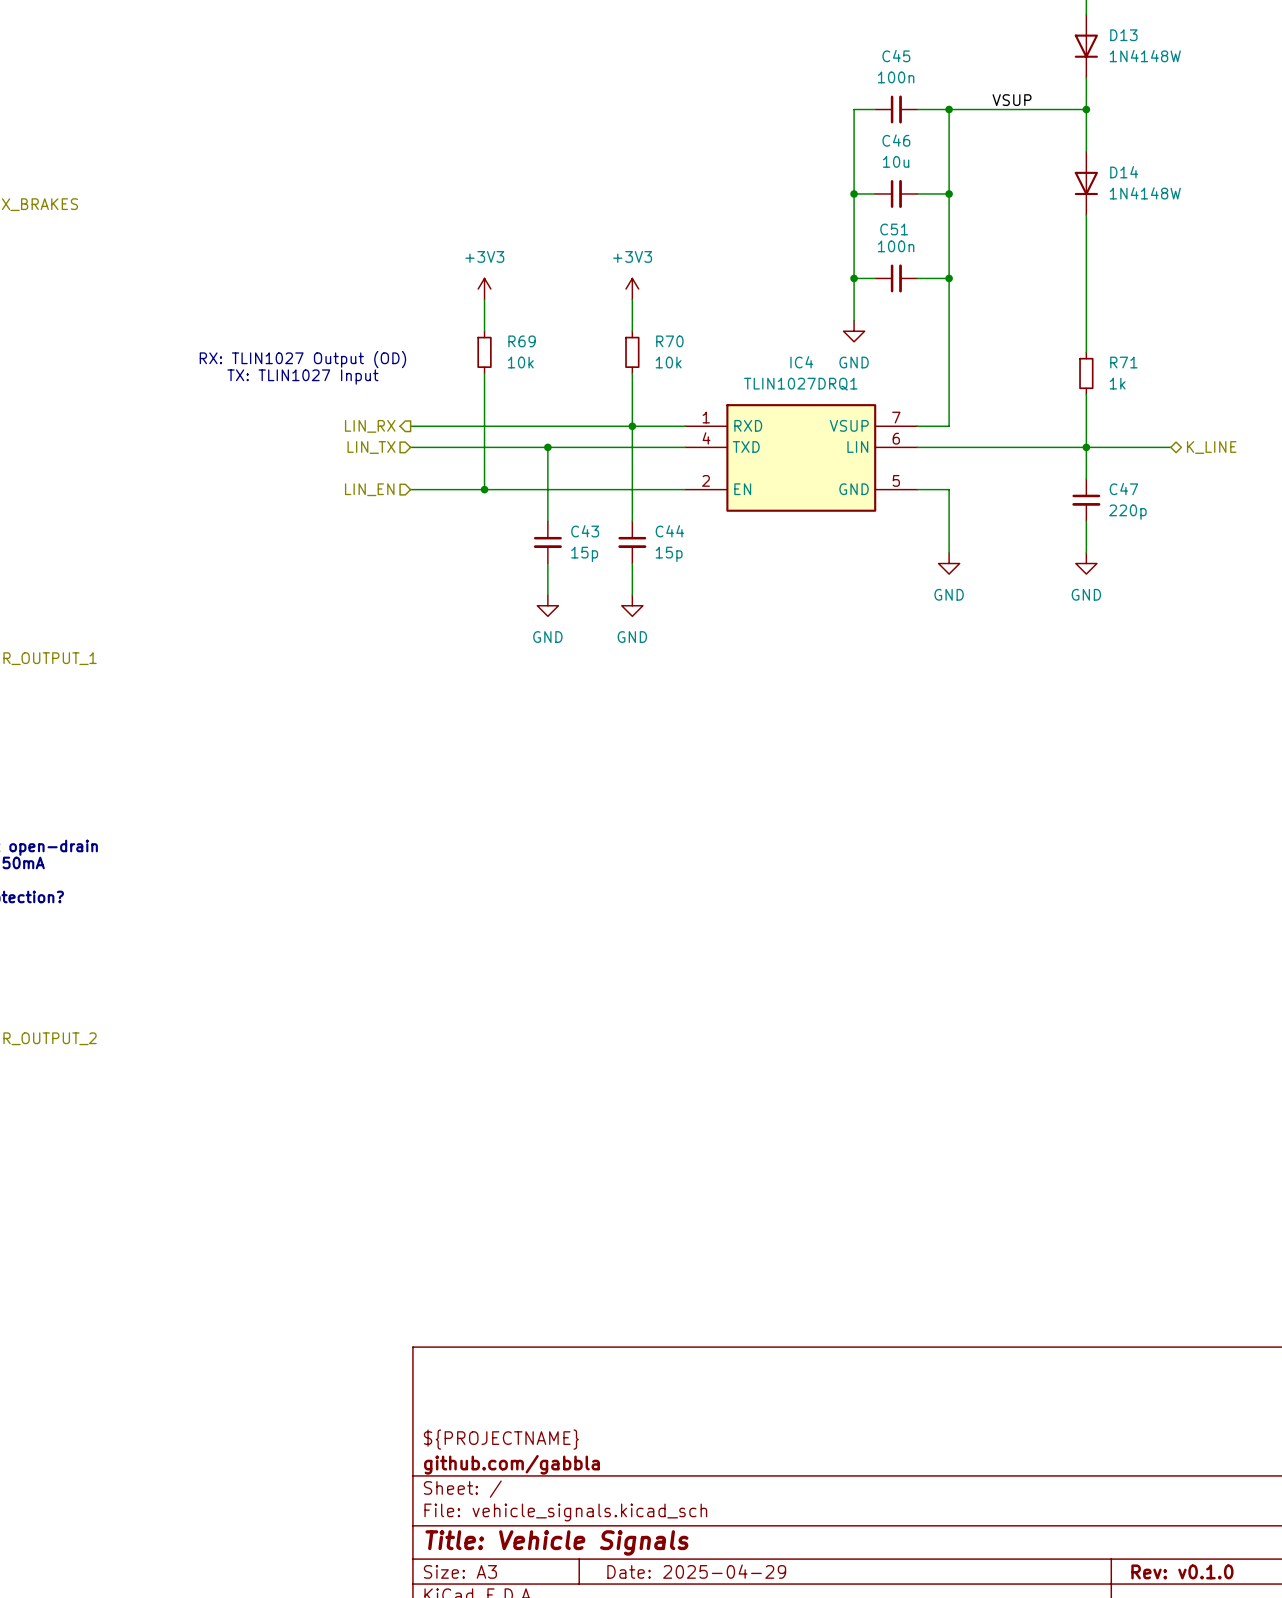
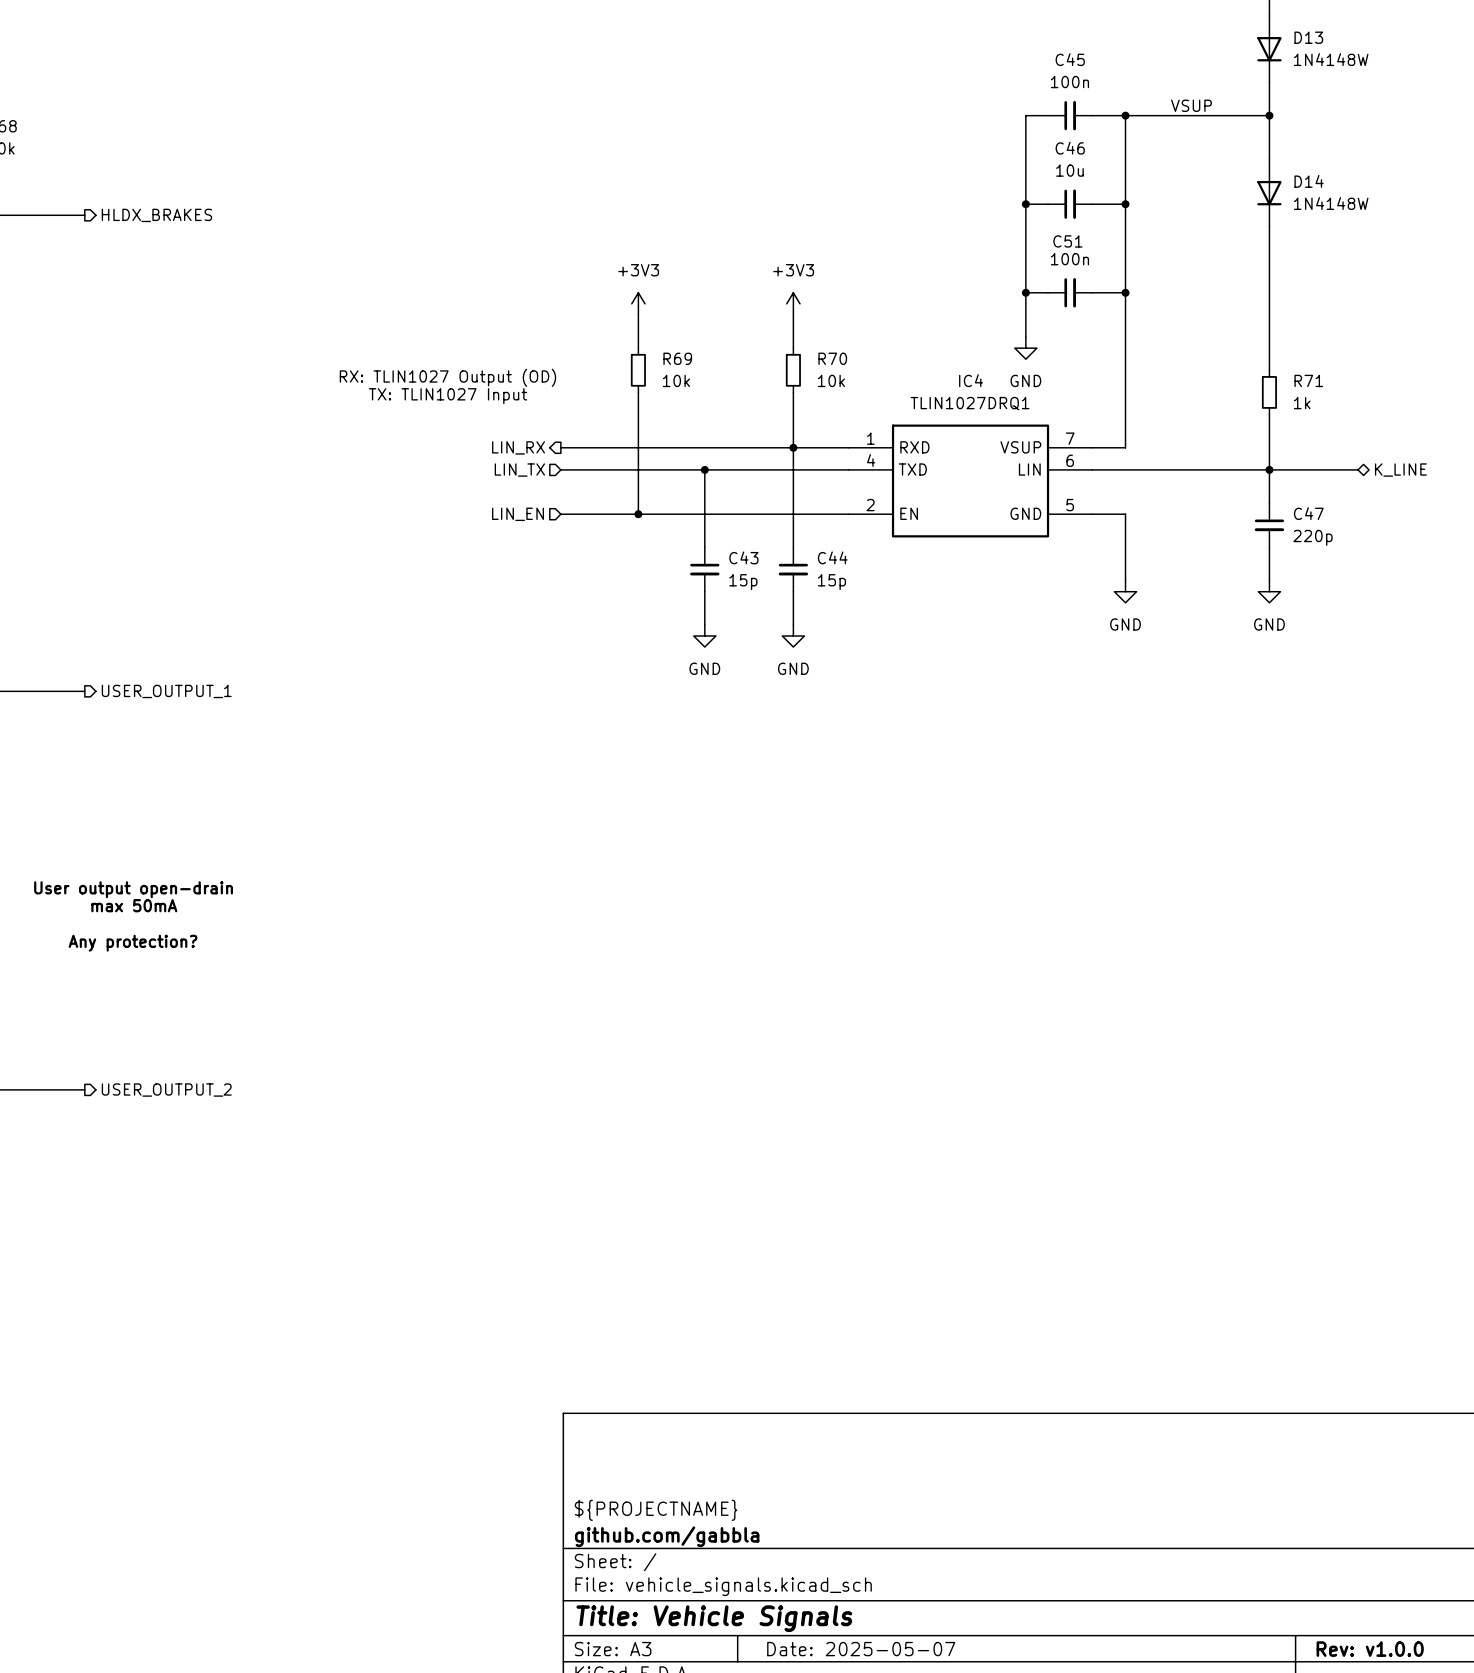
title block: Date: 2025-04-29 (696, 1571) -> Date: 2025-05-07 (861, 1649)
title block: Rev: v0.1.0 (1182, 1571) -> Rev: v1.0.0 (1370, 1649)

